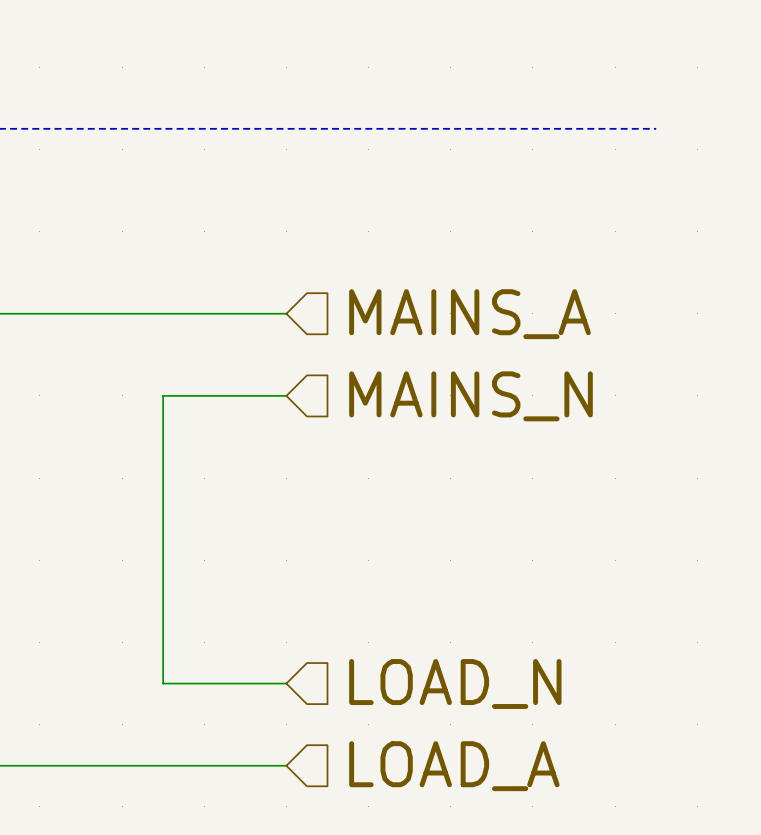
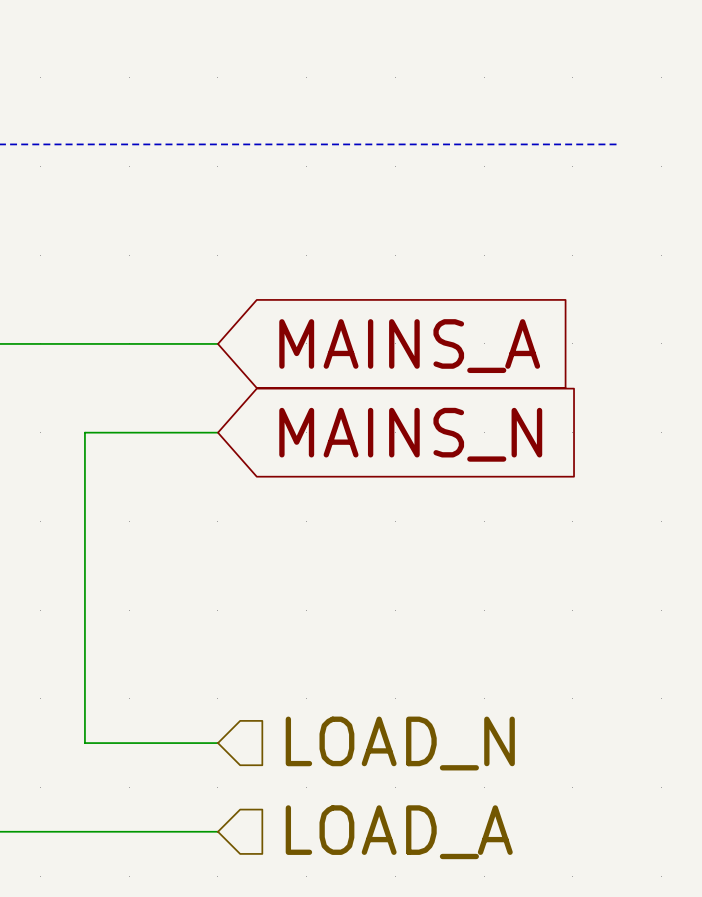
hierarchical label: MAINS_A (470, 314) -> none
global label: none -> MAINS_A (409, 346)
hierarchical label: MAINS_N (470, 396) -> none
global label: none -> MAINS_N (410, 434)

